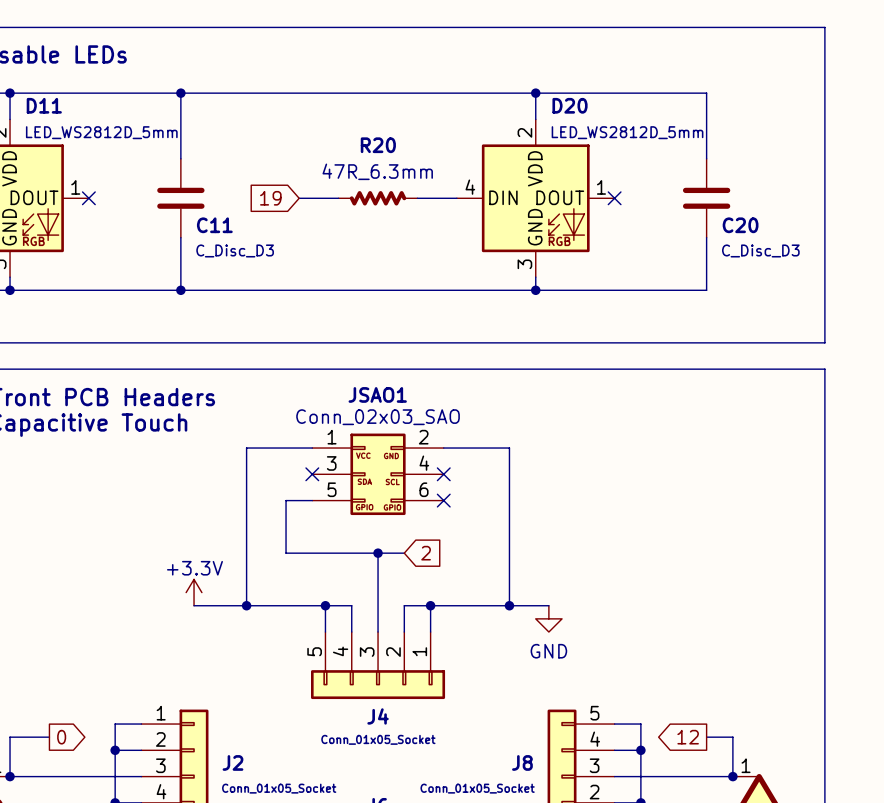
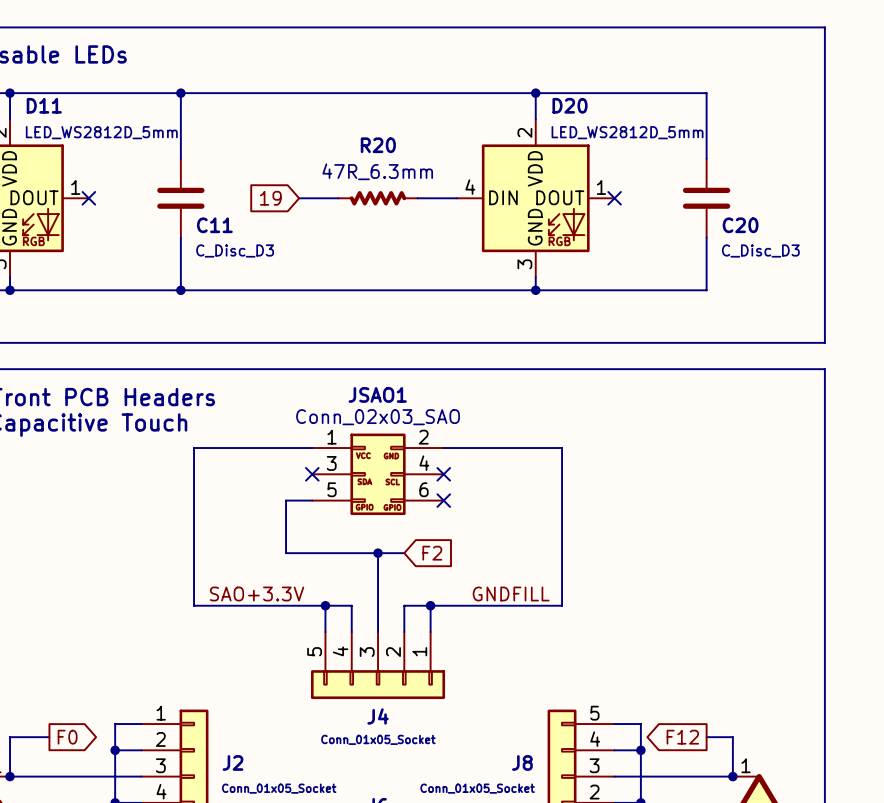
wire: (246, 448) (246, 605) -> (246, 448) (194, 448) (194, 605)
wire: (509, 448) (509, 605) -> (509, 448) (562, 448) (562, 605) (548, 605)
global label: 2 (426, 553) -> F2 (432, 553)
power symbol: +3.3V (194, 592) -> none
label: none -> SAO+3.3V (257, 594)
label: none -> GNDFILL (511, 594)
junction: (246, 605) -> none
junction: (509, 605) -> none
power symbol: GND (548, 618) -> none
global label: 0 (61, 737) -> F0 (67, 737)
global label: 12 (688, 737) -> F12 (682, 737)

